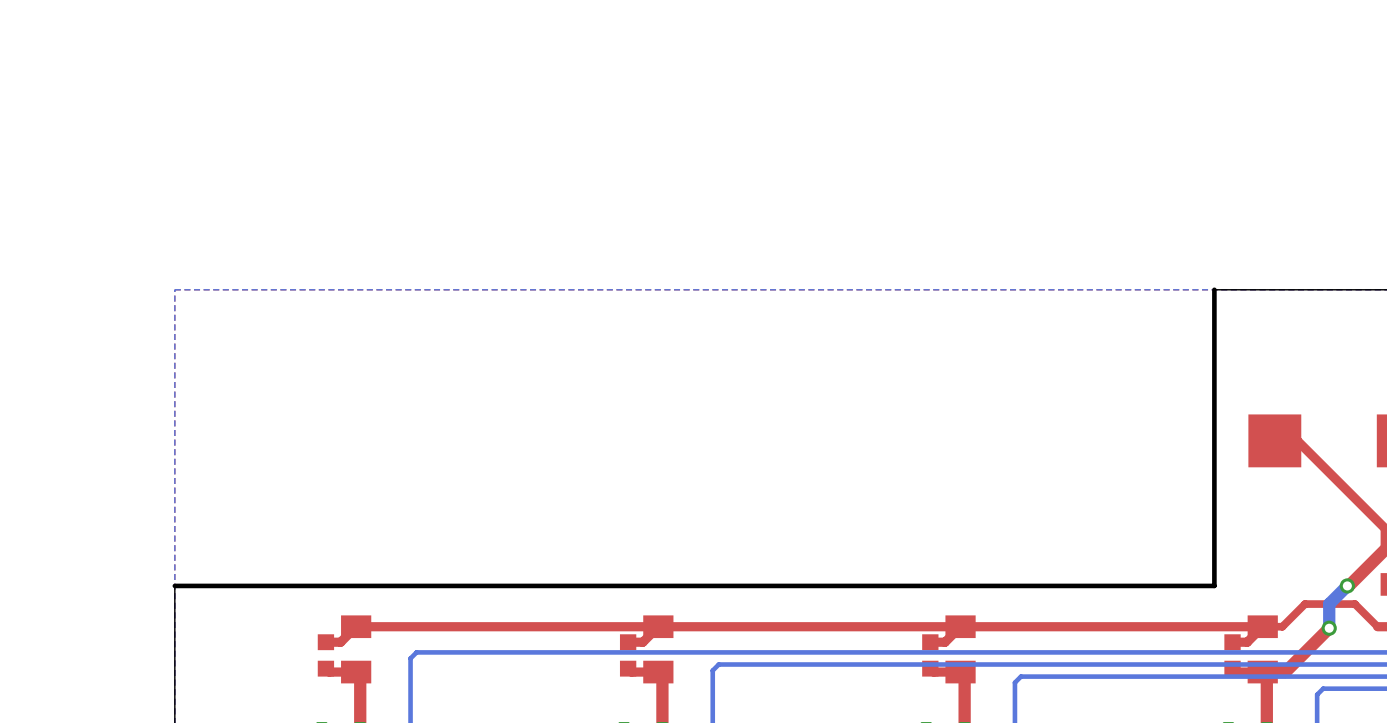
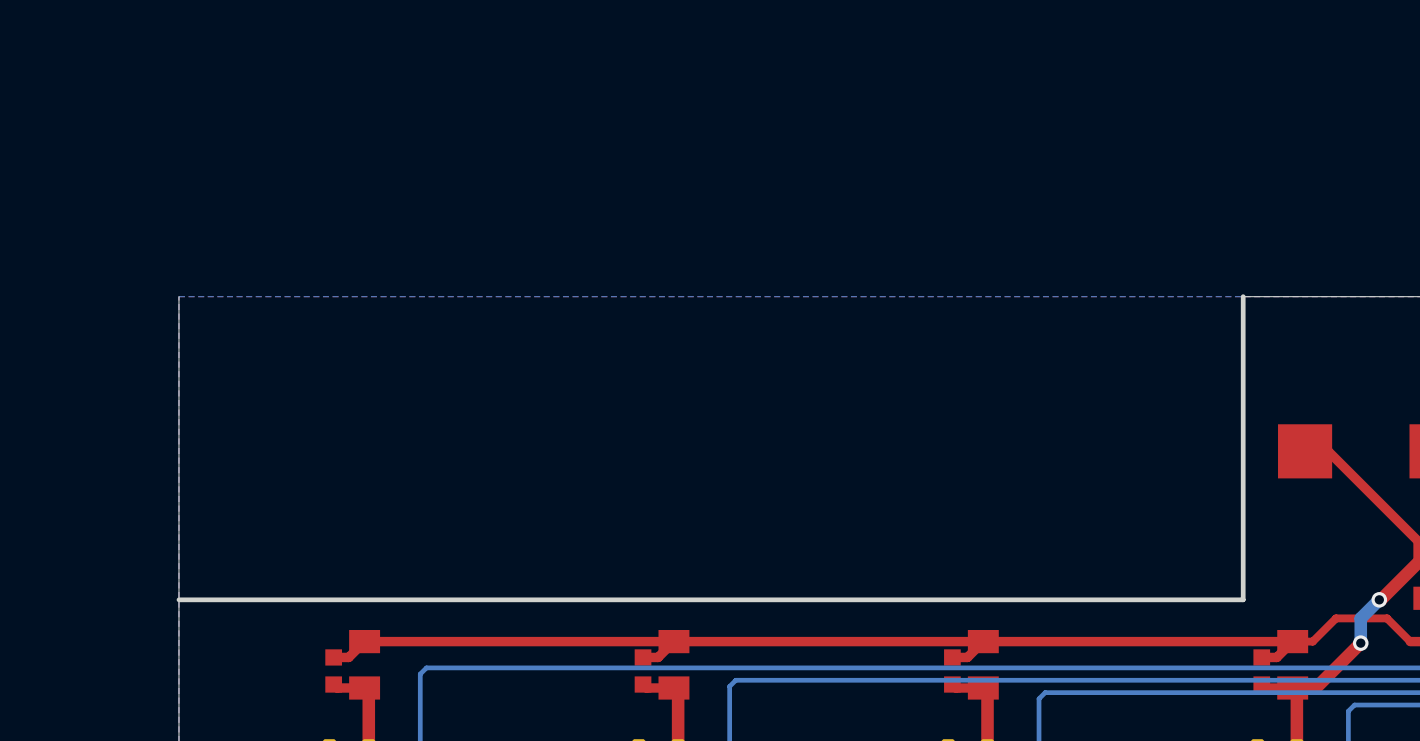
board edge: none -> (178, 296) (178, 599)

